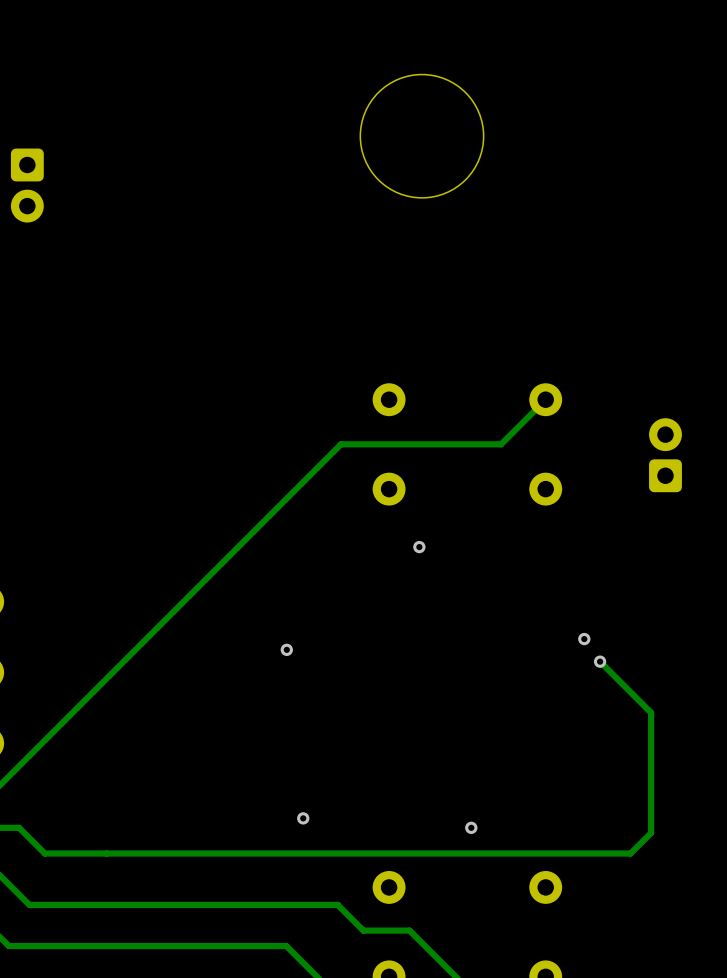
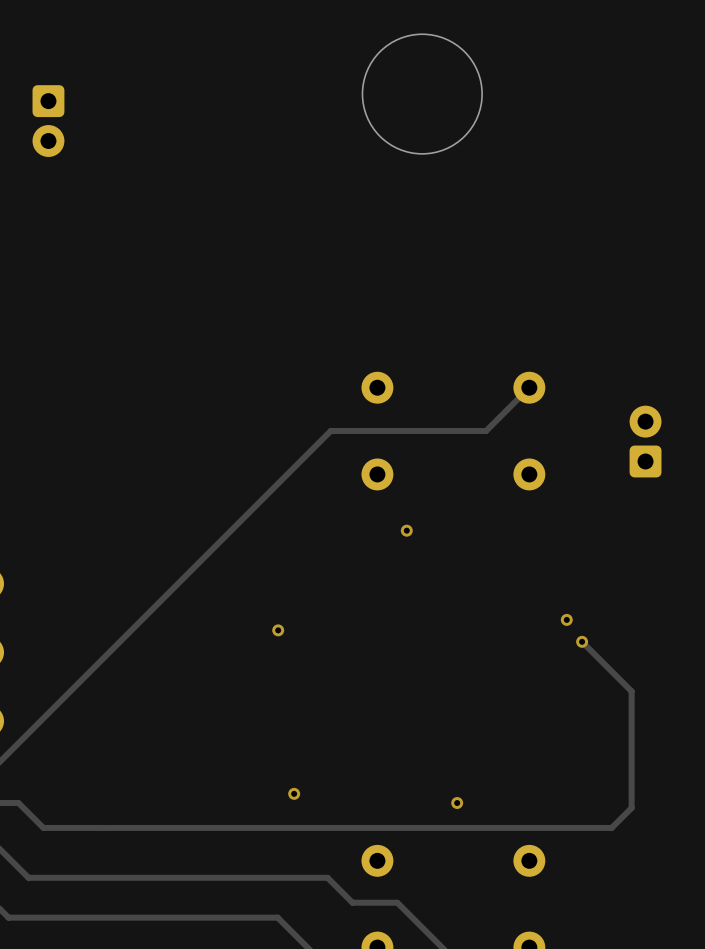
round board edge position: (421, 136) -> (422, 94)
part position: (27, 185) -> (48, 121)

